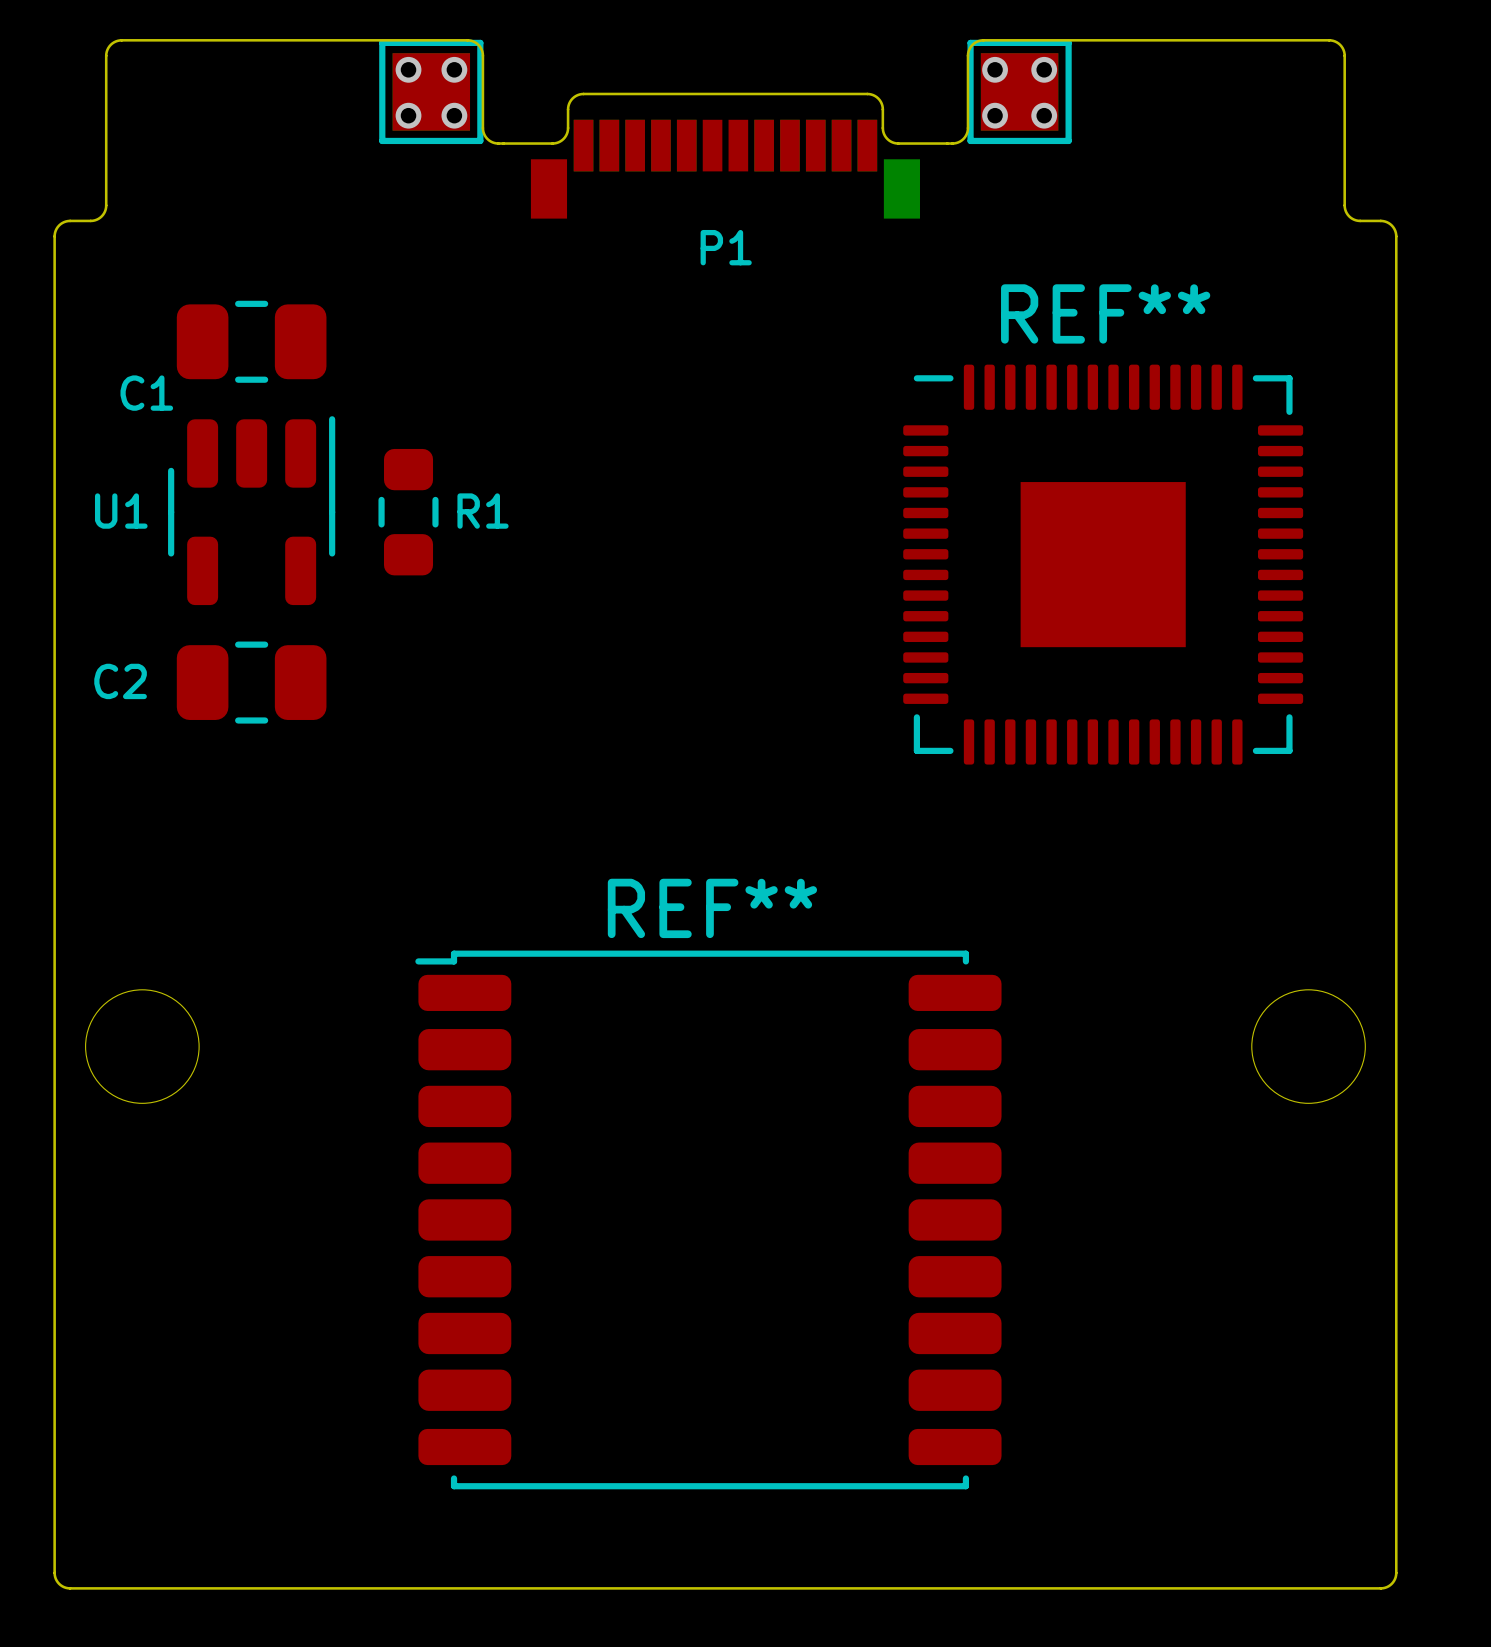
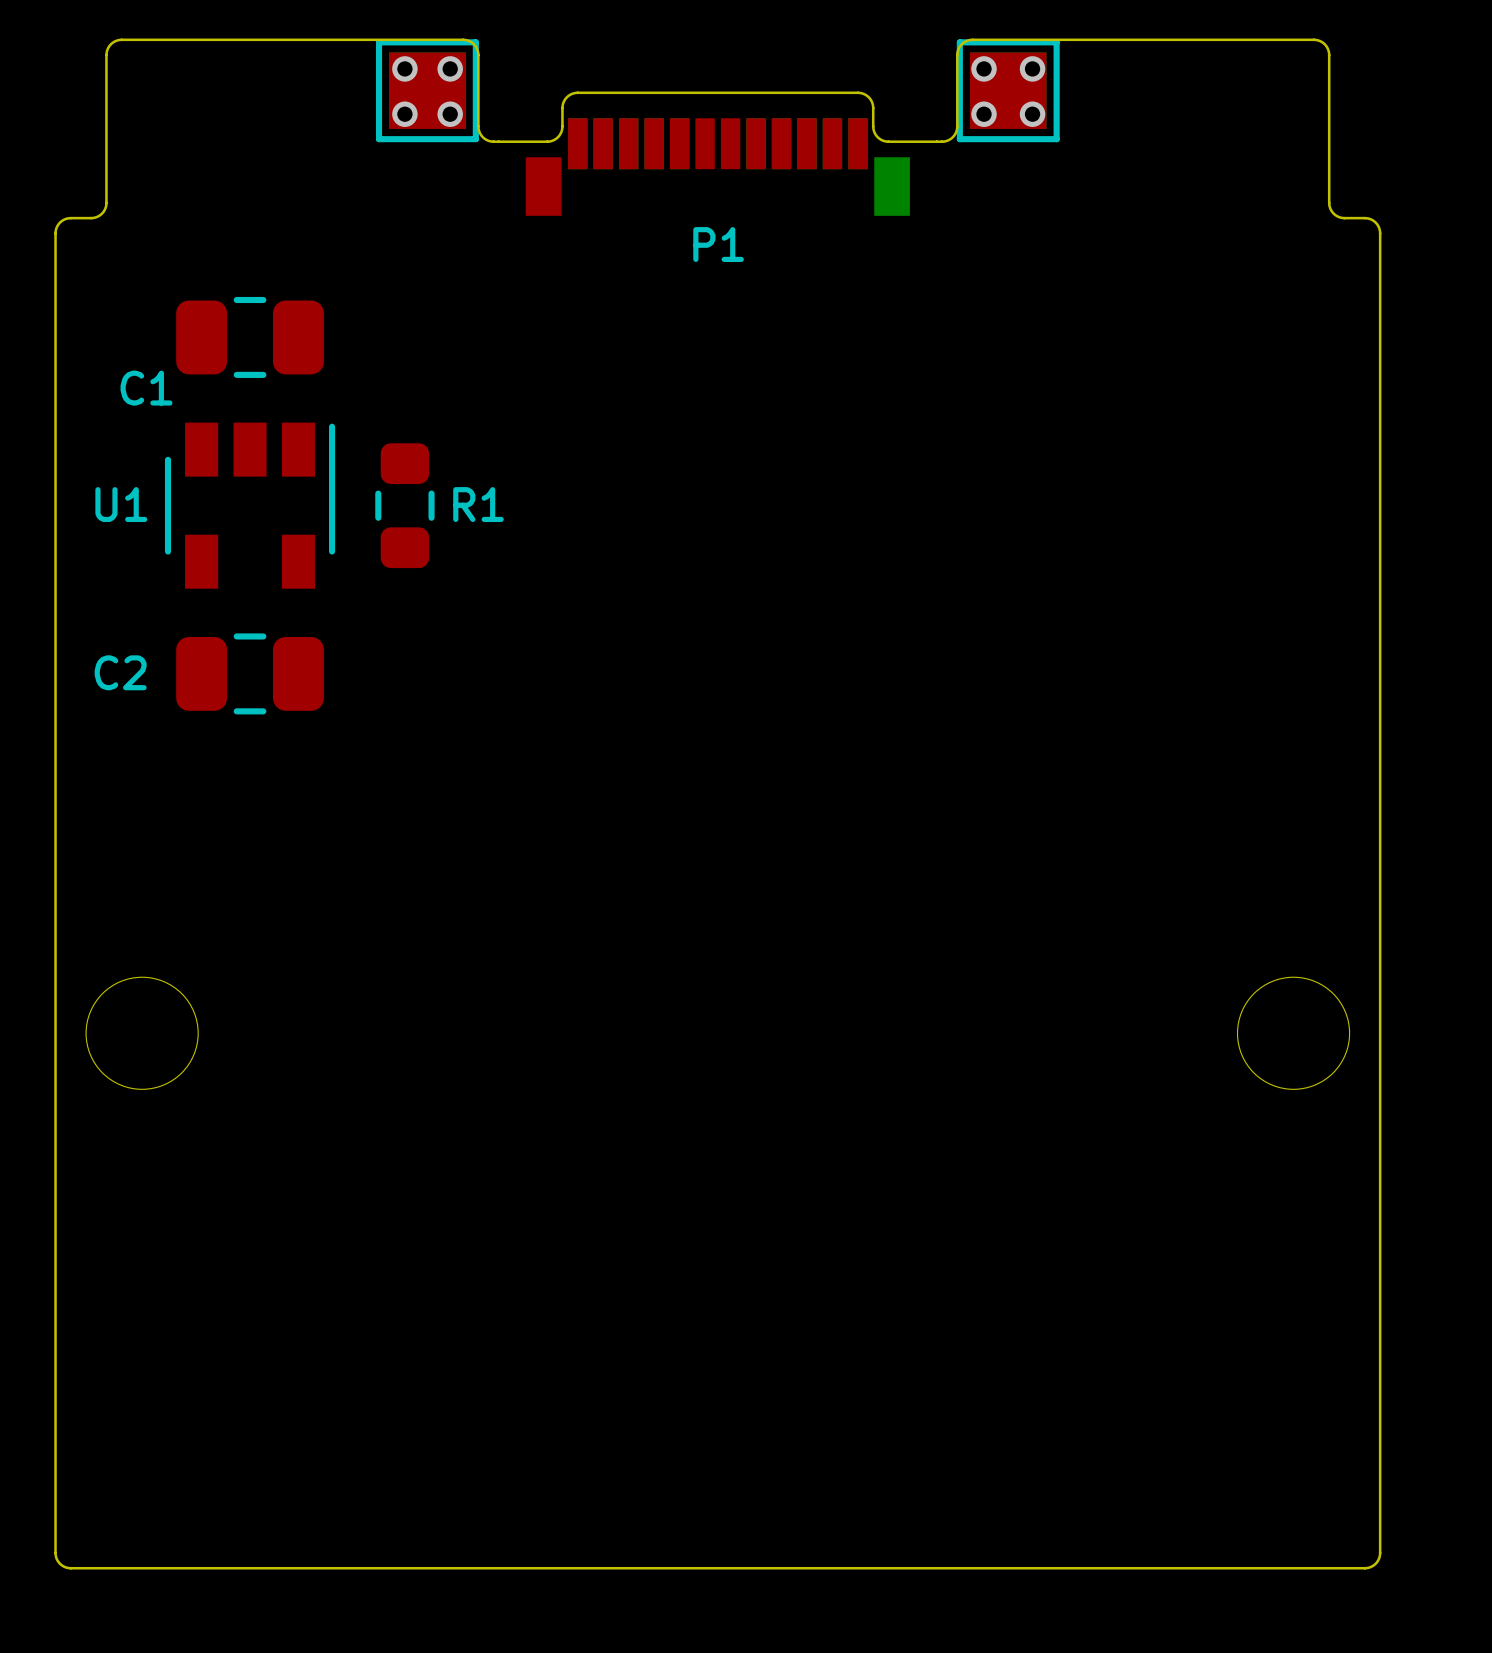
U1 footprint: [168, 416, 336, 606] -> [164, 422, 336, 589]
REF**: (1103, 564) -> none
REF**: (708, 1219) -> none

